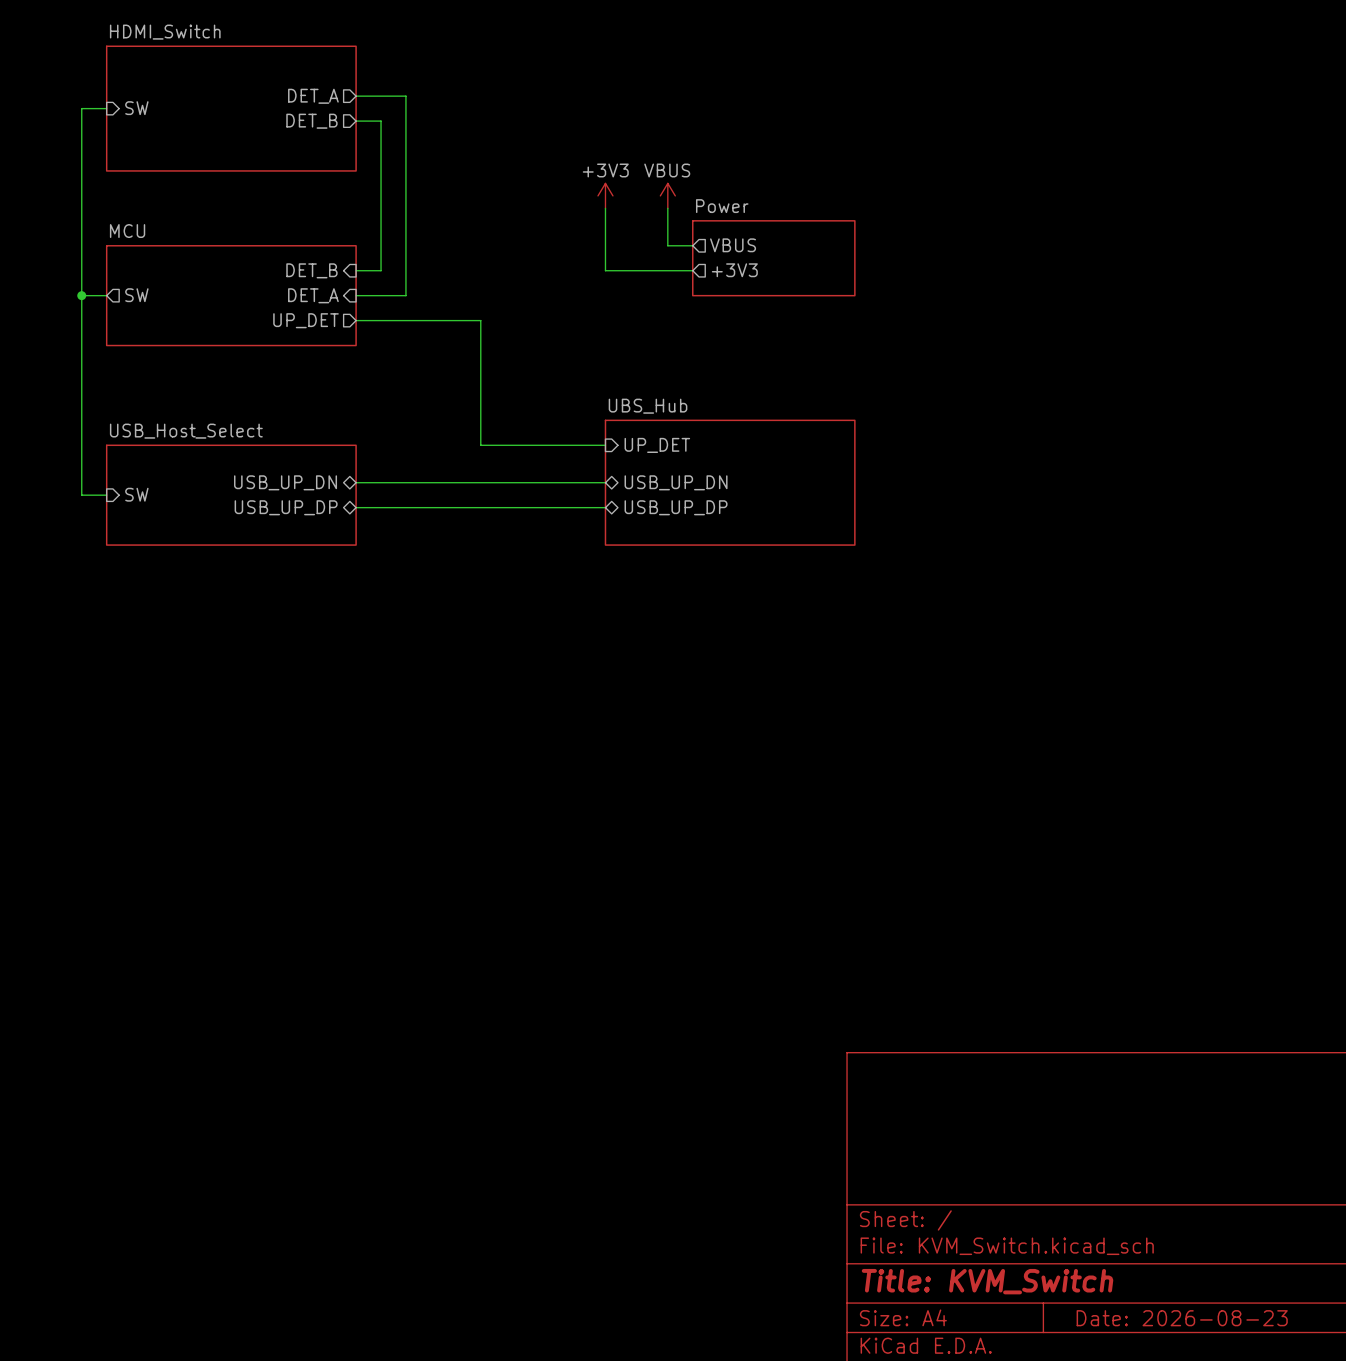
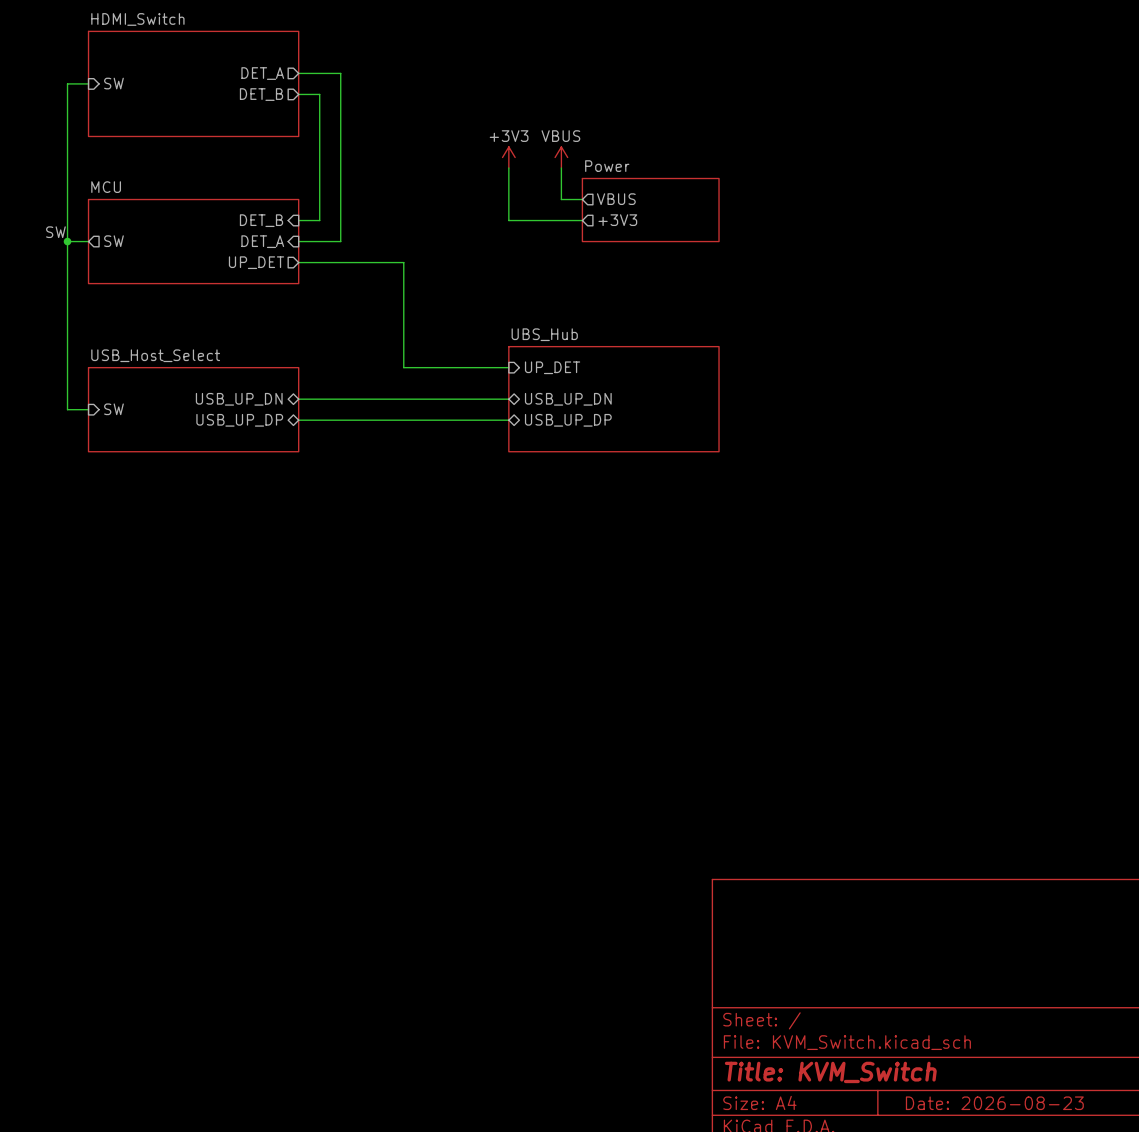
label: none -> SW (55, 232)

